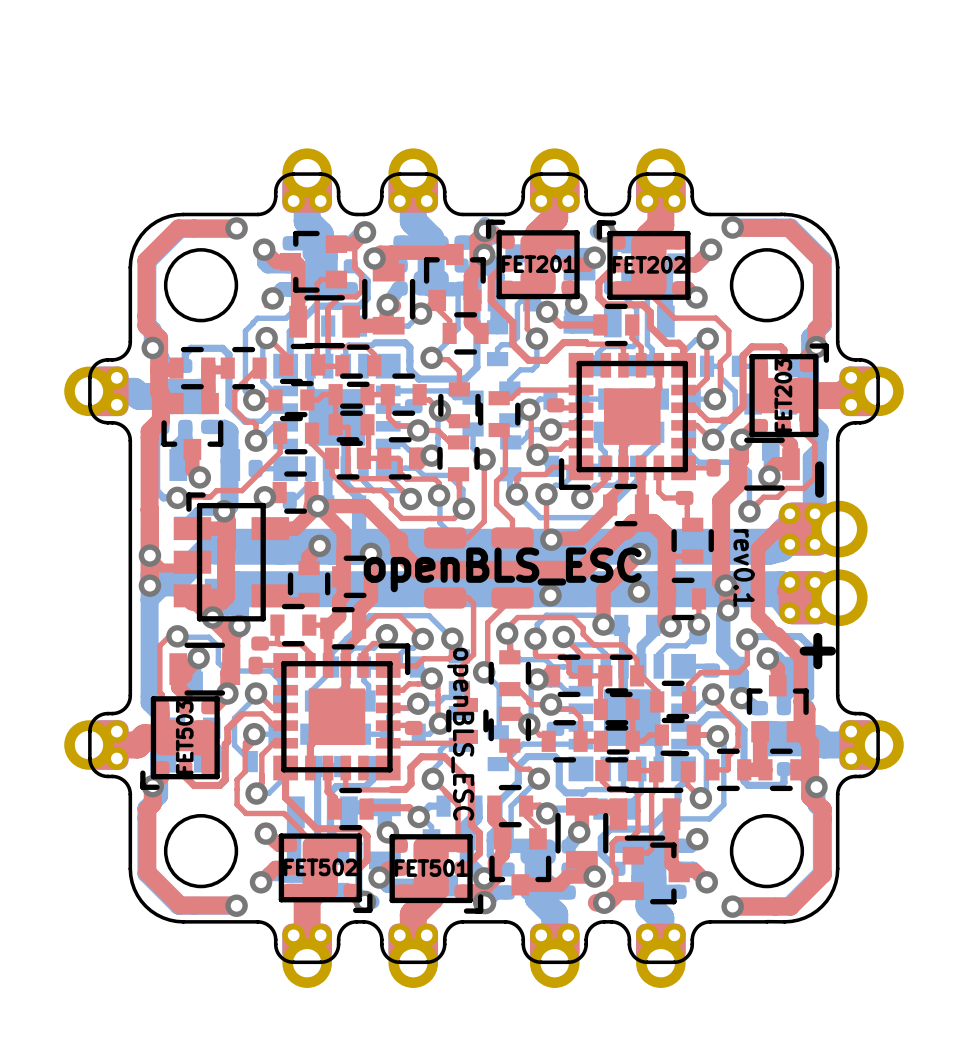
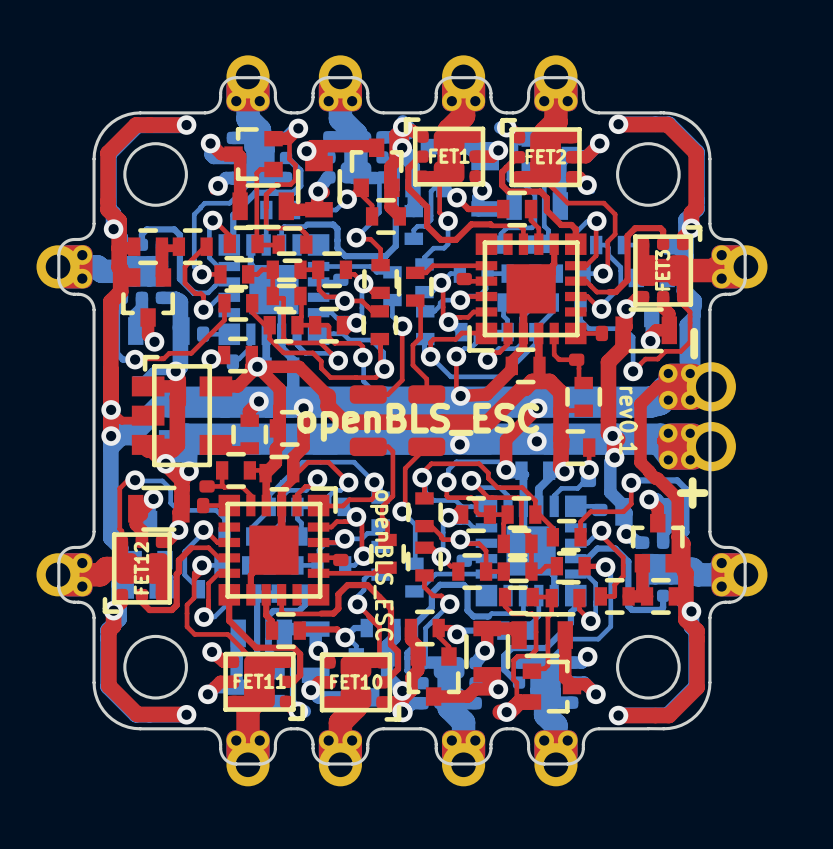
FET201 name: FET201 (538, 264) -> FET1 (449, 156)
FET202 name: FET202 (649, 264) -> FET2 (545, 156)
FET203 name: FET203 (783, 395) -> FET3 (662, 270)
FET503 name: FET503 (184, 737) -> FET12 (141, 568)
FET502 name: FET502 (320, 867) -> FET11 (259, 681)
FET501 name: FET501 (431, 868) -> FET10 (356, 681)

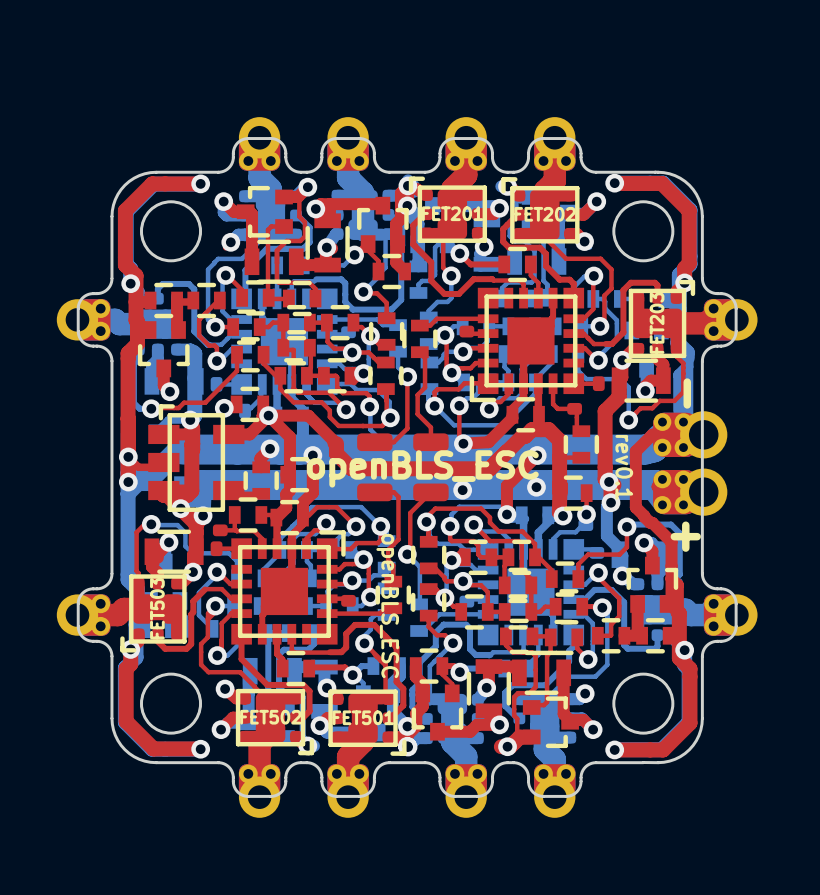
FET1 name: FET1 (449, 156) -> FET201 (452, 213)
FET2 name: FET2 (545, 156) -> FET202 (545, 214)
FET3 name: FET3 (662, 270) -> FET203 (657, 323)
FET12 name: FET12 (141, 568) -> FET503 (157, 608)
FET11 name: FET11 (259, 681) -> FET502 (270, 717)
FET10 name: FET10 (356, 681) -> FET501 (363, 717)

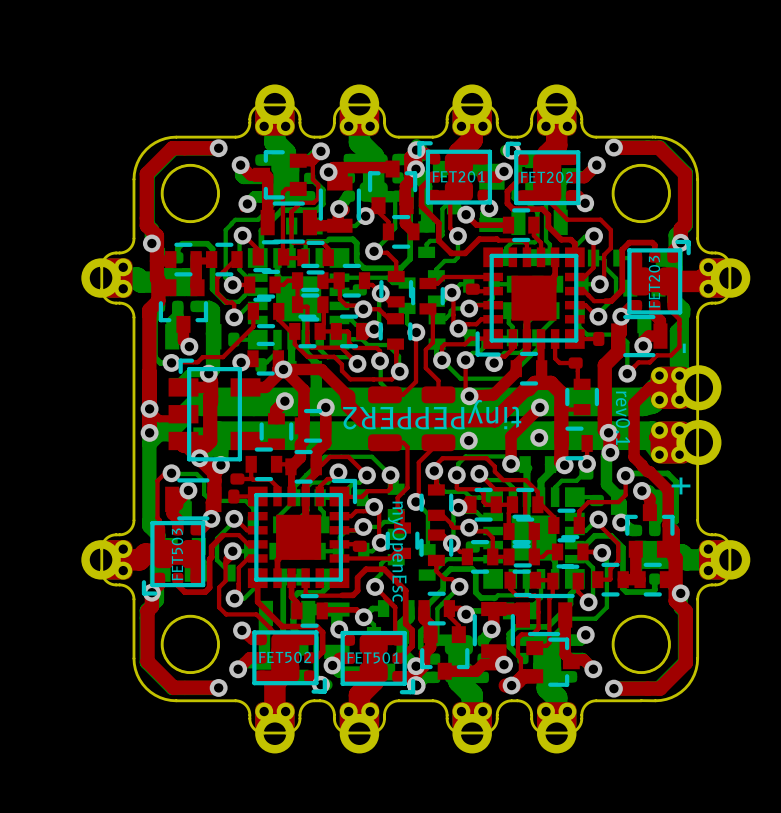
text: openBLS_ESC (422, 468) -> tinyPEPPER2 (432, 414)
text: openBLS_ESC (387, 606) -> myOpenEsc (397, 551)

